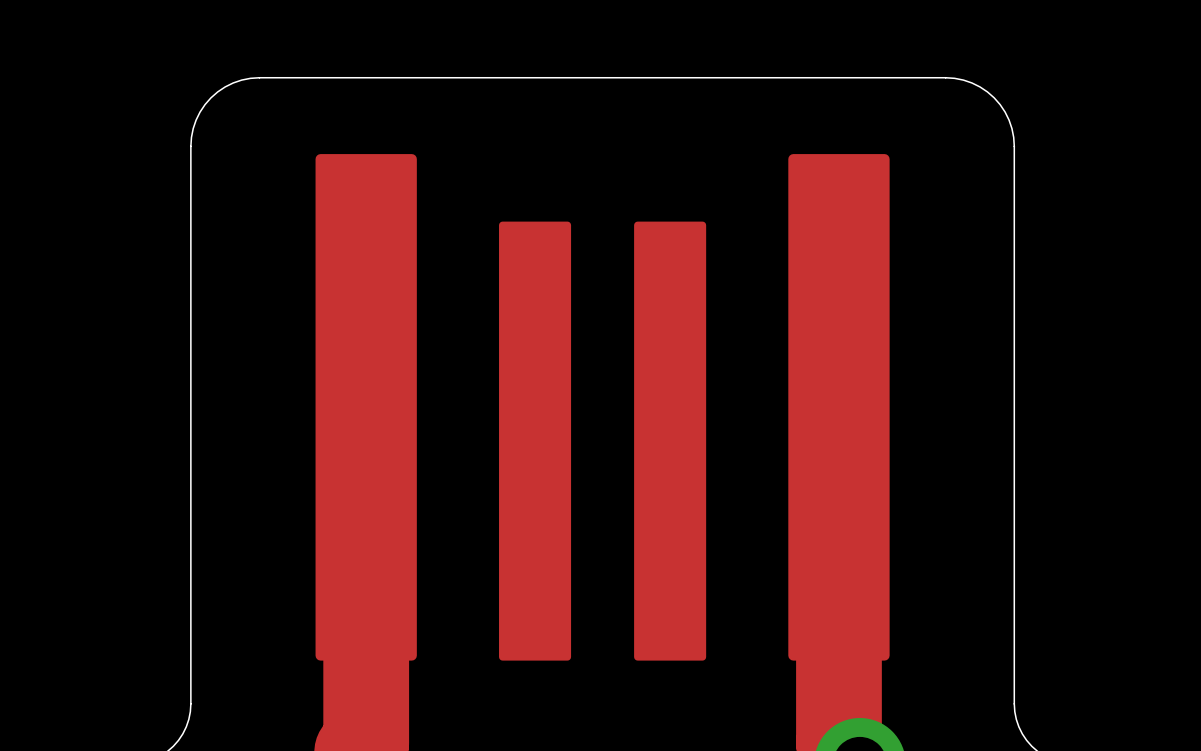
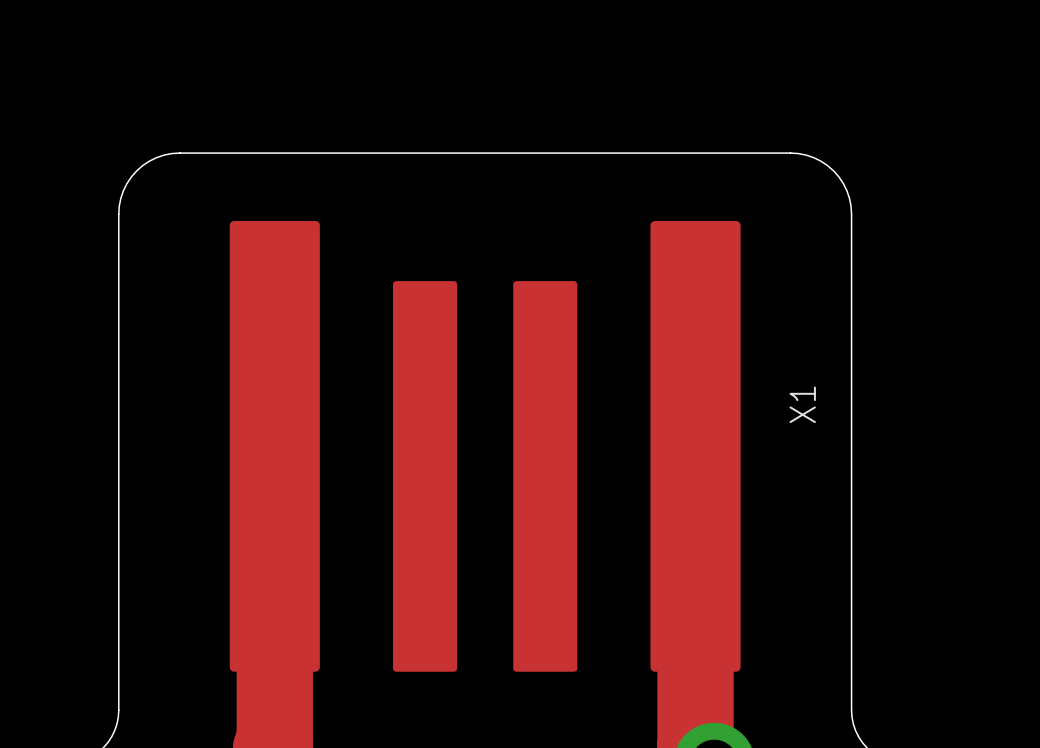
X1 name: none -> X1 (802, 404)

